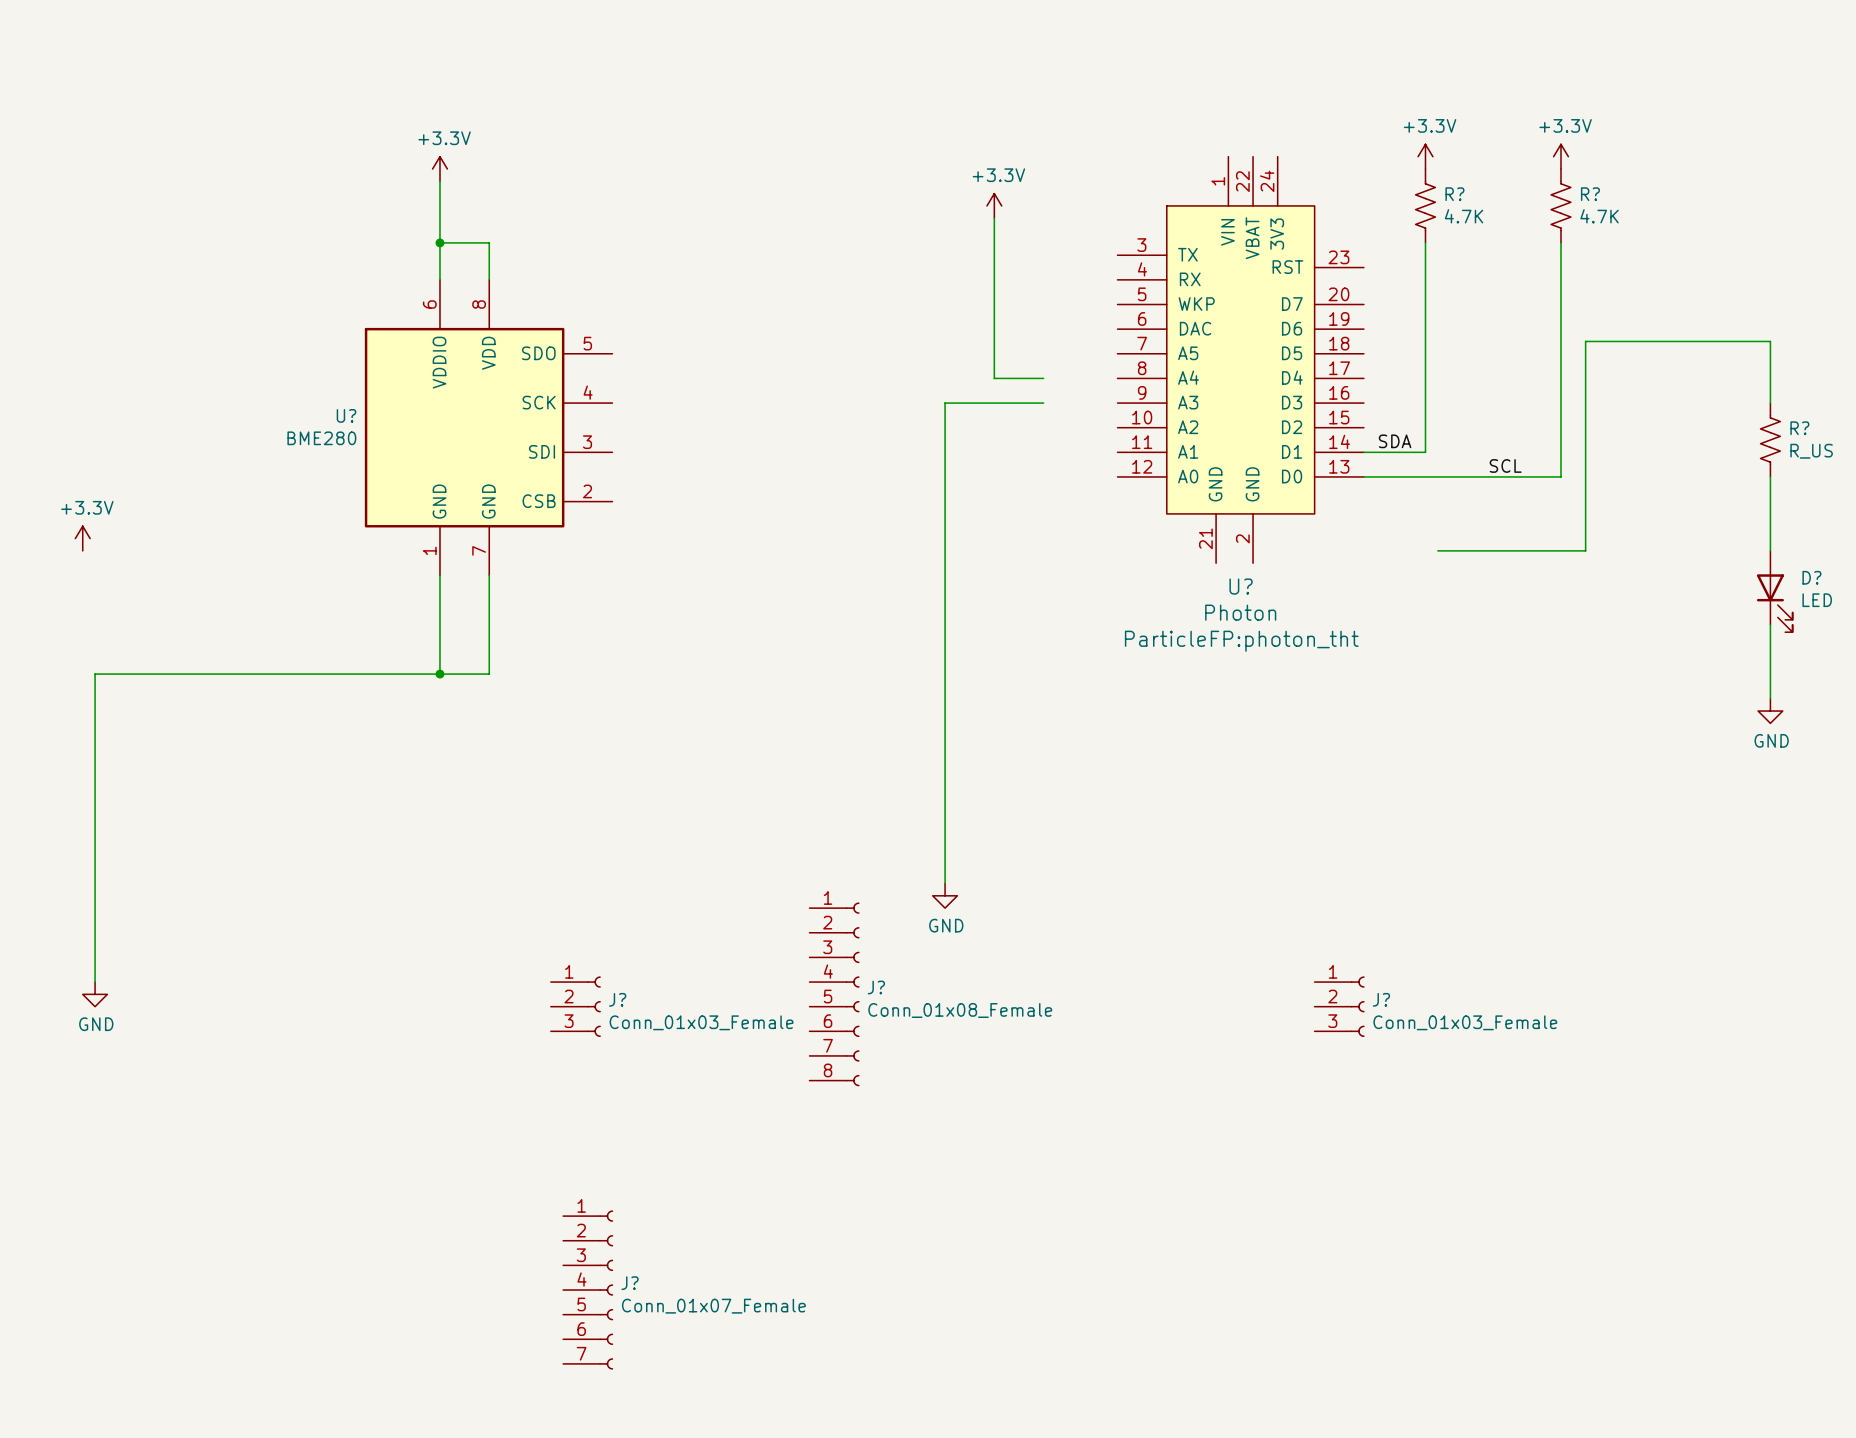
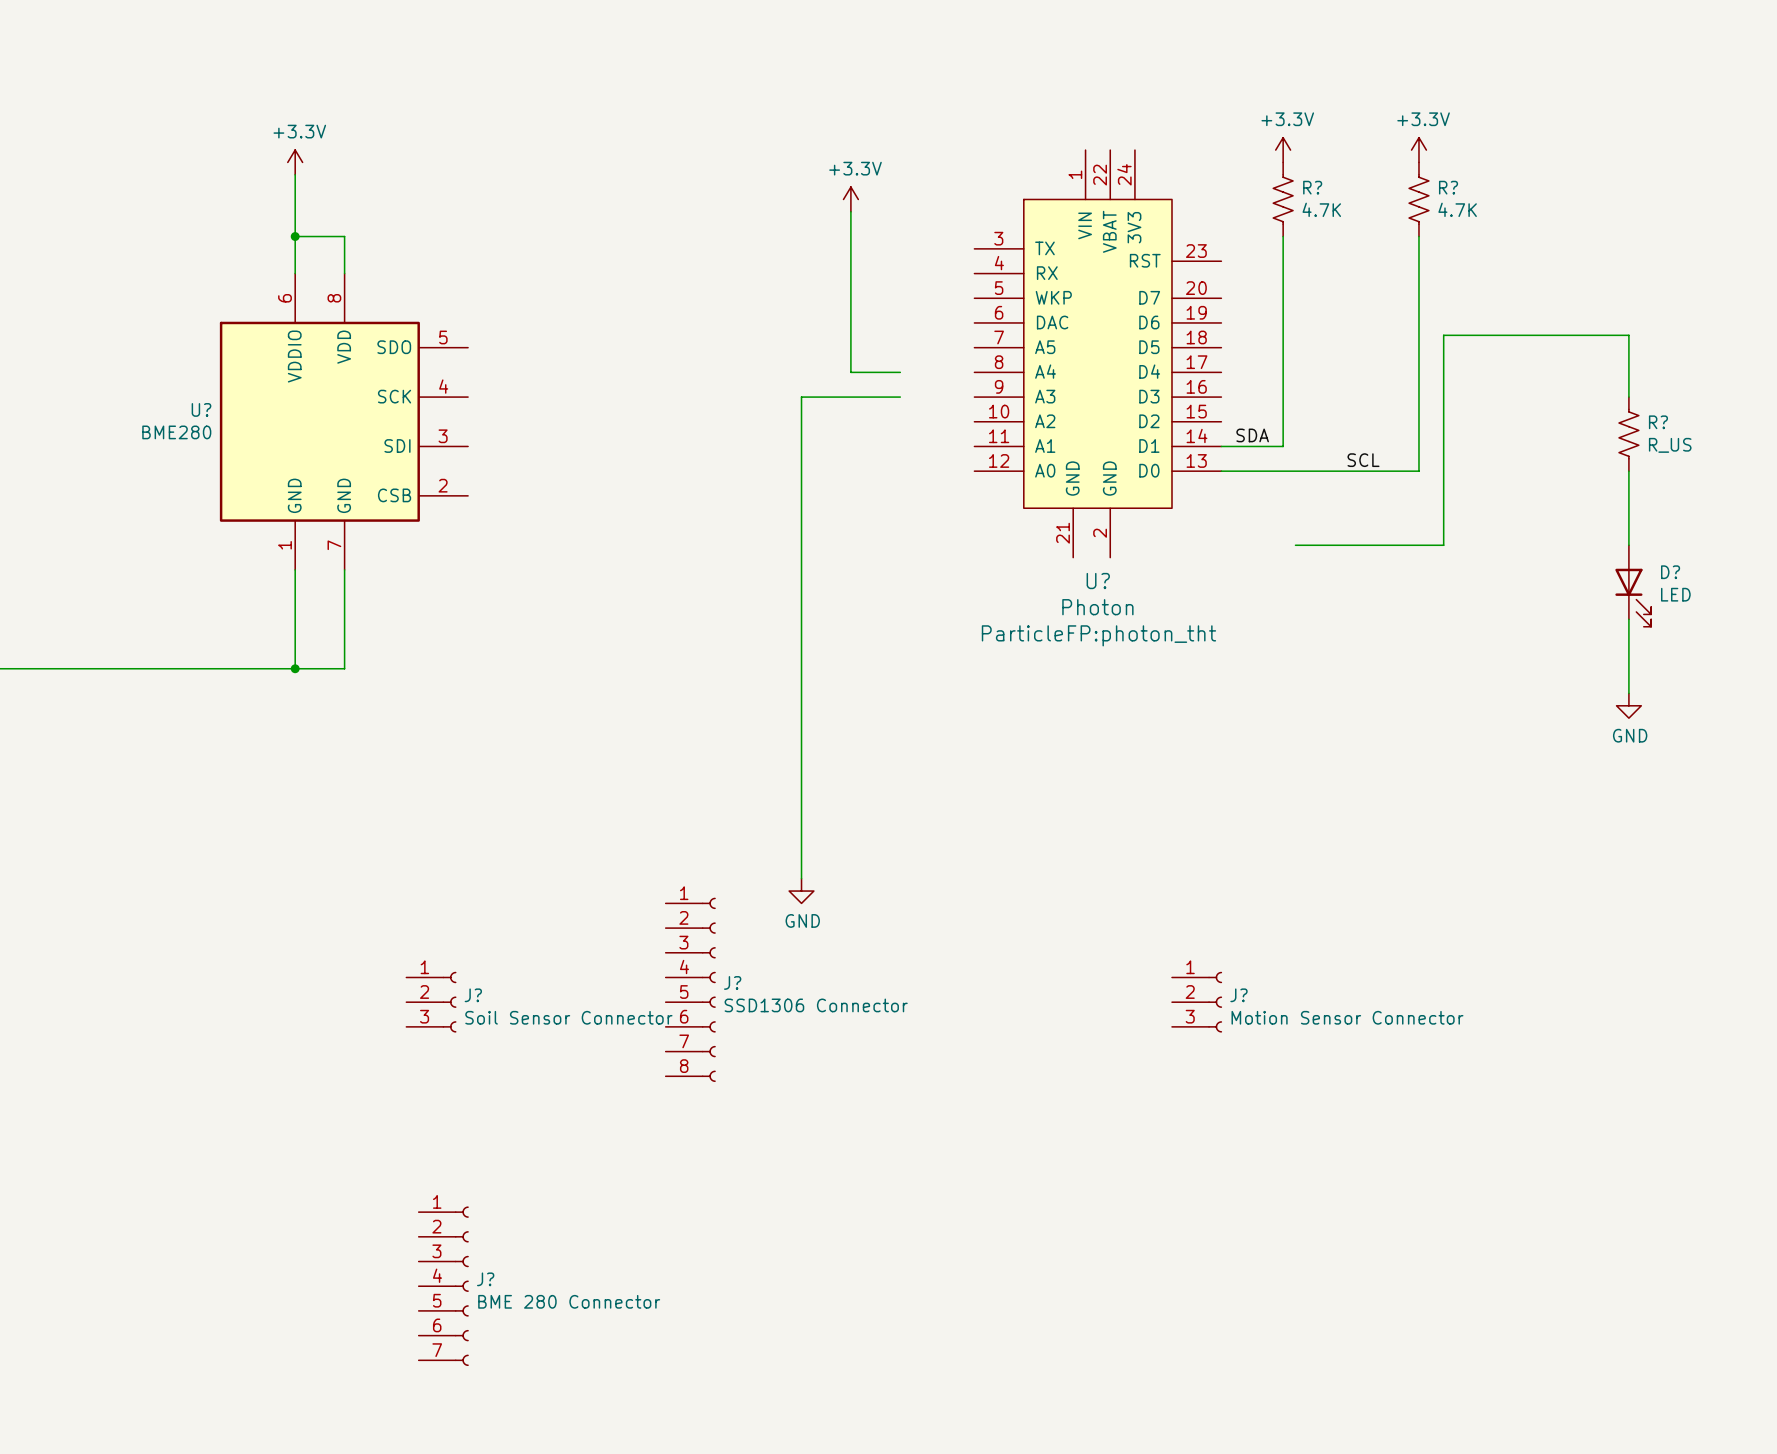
J? value: Conn_01x08_Female (960, 1010) -> SSD1306 Connector (816, 1005)
J? value: Conn_01x03_Female (701, 1022) -> Soil Sensor Connector (568, 1017)
J? value: Conn_01x03_Female (1465, 1022) -> Motion Sensor Connector (1347, 1017)
J? value: Conn_01x07_Female (713, 1306) -> BME 280 Connector (569, 1301)

